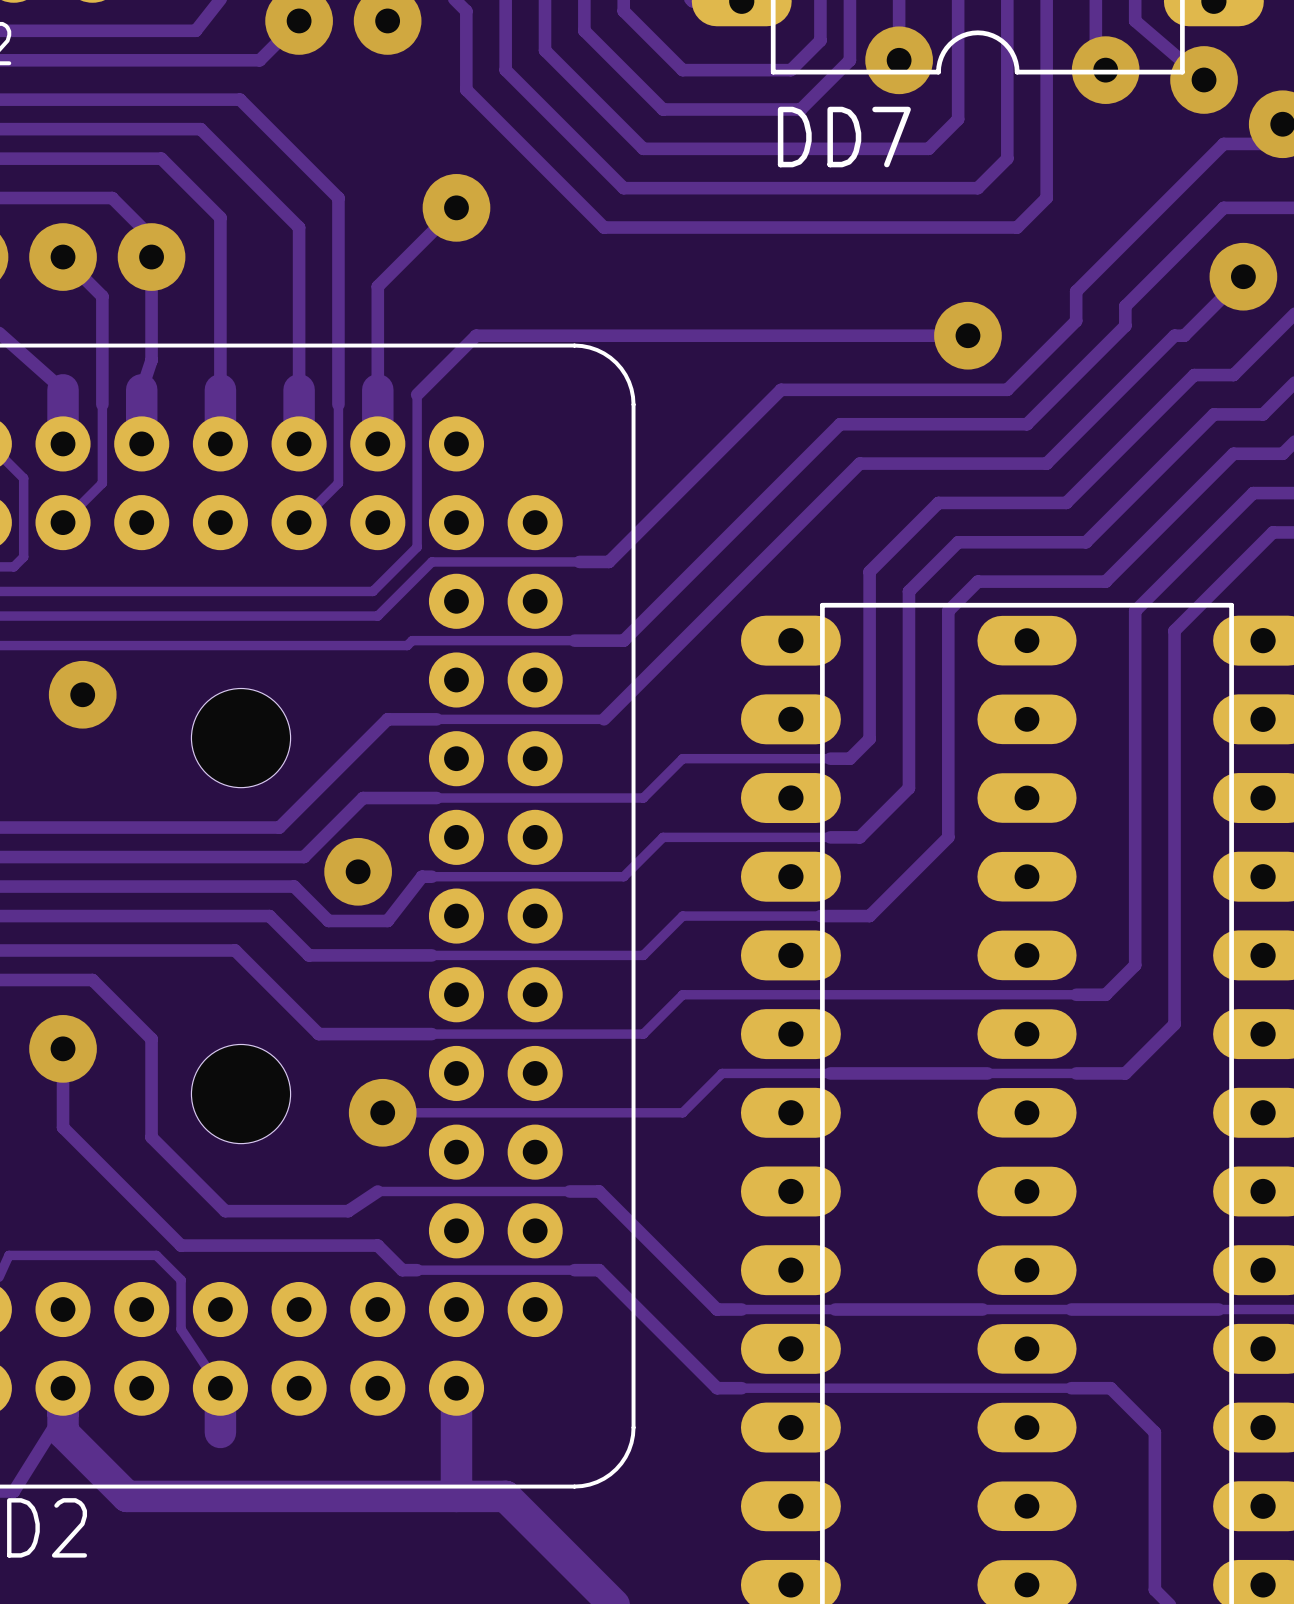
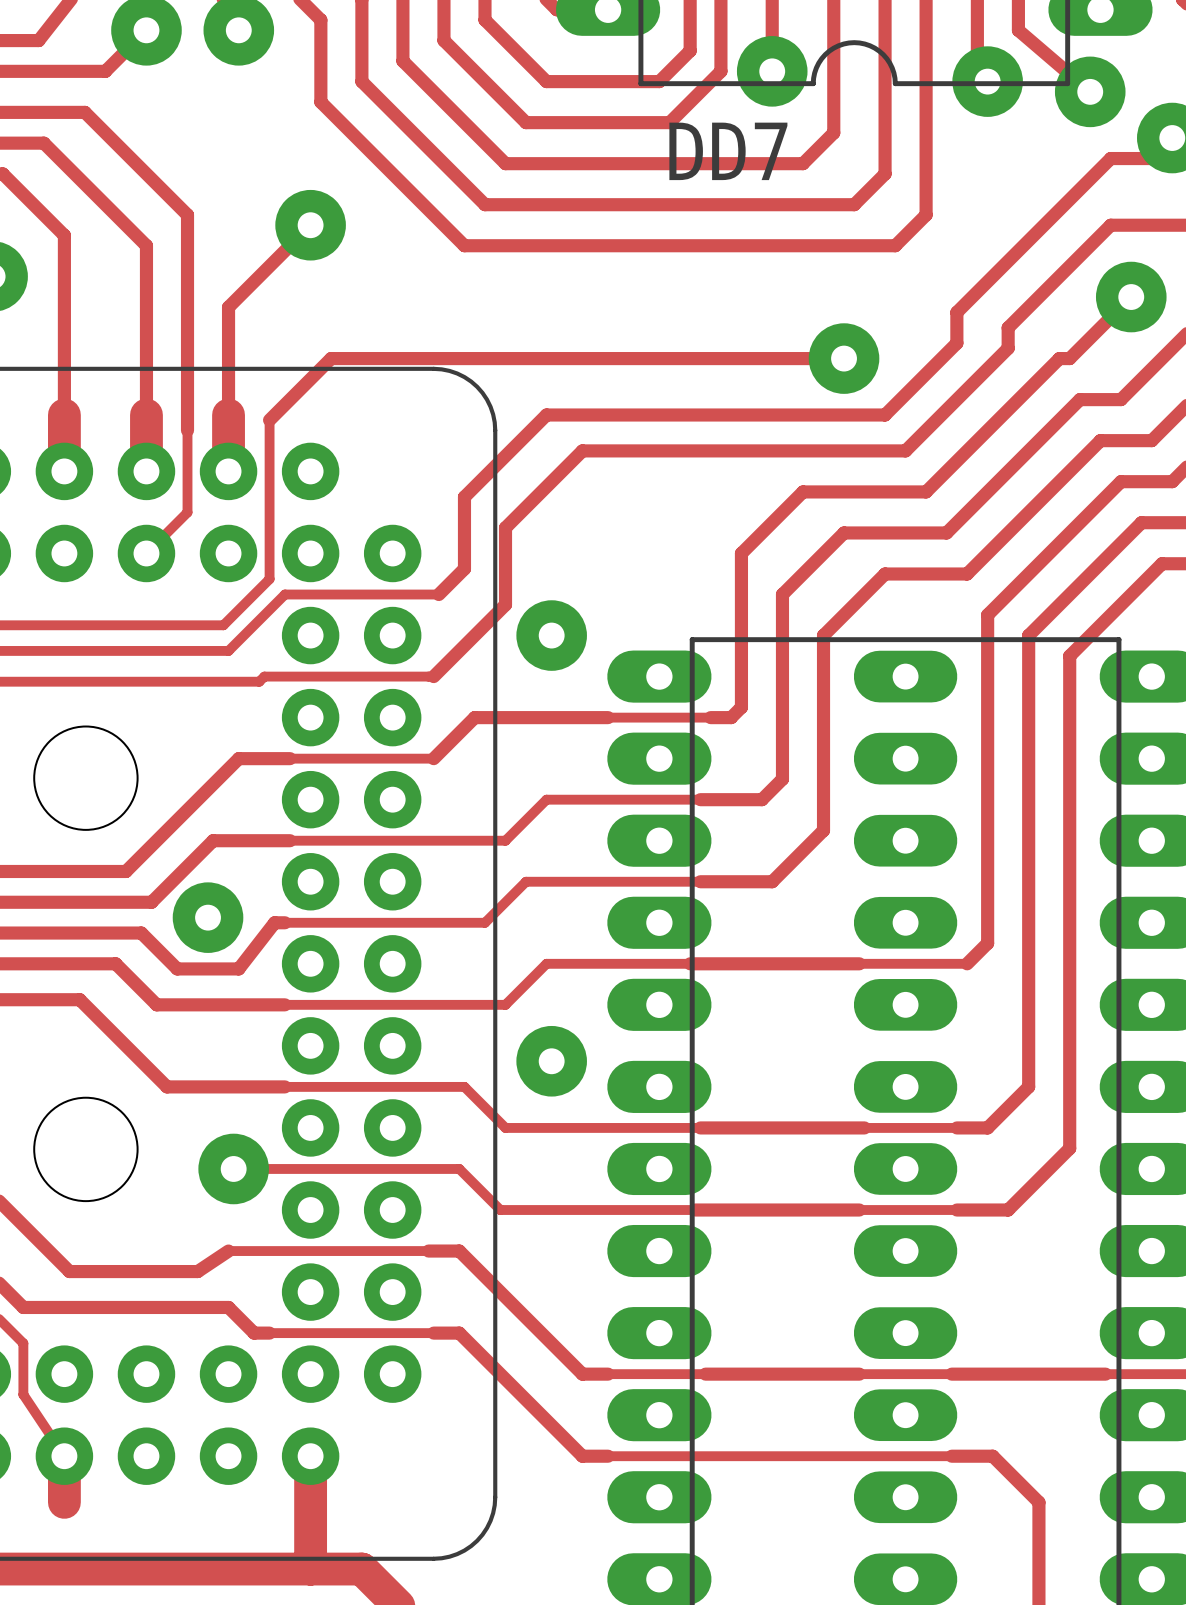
track: (781, 389) (608, 561) (579, 561) -> (649, 415) (546, 415) (464, 497) (464, 568) (438, 594)
track: (840, 424) (623, 640) (574, 640) -> (710, 450) (582, 450) (505, 527) (505, 604) (433, 676)
track: (928, 463) (859, 463) (604, 719) (574, 719) -> (741, 707) (731, 717) (474, 717) (433, 758)
track: none -> (803, 491) (741, 553) (741, 604)
track: (967, 502) (938, 502) (869, 571) -> (844, 532) (782, 594) (782, 625)
track: (1007, 542) (958, 542) (908, 591) -> (885, 574) (823, 635) (823, 645)
track: (1105, 581) (977, 581) (948, 611) -> none
via: none -> (551, 635)
track: (1145, 601) (1135, 611) (1135, 965) (1105, 994) (682, 994) (643, 1034) (604, 1034) -> none
track: (1184, 620) (1174, 630) (1174, 1024) (1125, 1073) (1105, 1073) -> (1028, 635) (1028, 1086) (987, 1127)
track: none -> (1069, 656) (1069, 1148) (1008, 1210) (500, 1210) (459, 1168)
track: (869, 670) (869, 739) (849, 758) -> (782, 779) (761, 799) (720, 799)
track: (908, 739) (908, 788) (859, 837) -> (823, 830) (772, 881) (731, 881)
track: (948, 788) (948, 837) (869, 916) -> (987, 615) (987, 943) (967, 963) (741, 963)
via: none -> (551, 1061)
track: (722, 1073) (682, 1112) (599, 1112) -> (587, 1127) (505, 1127) (464, 1086)

